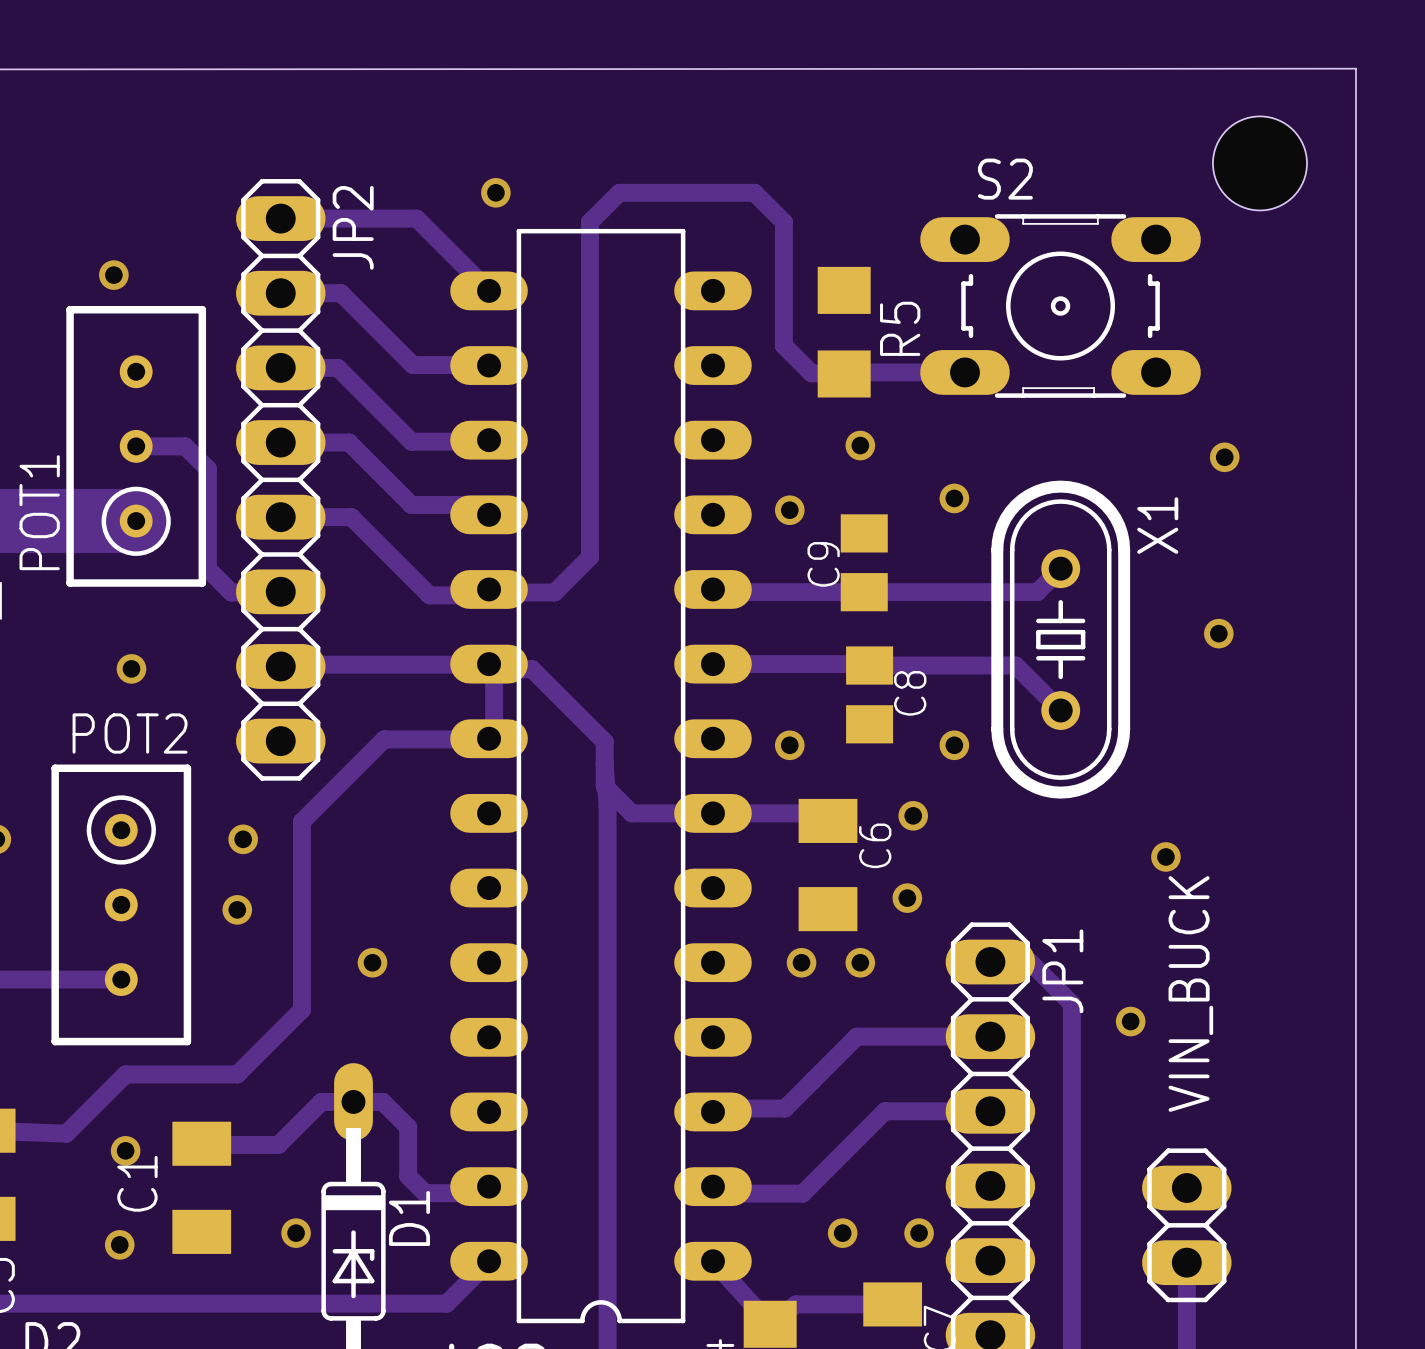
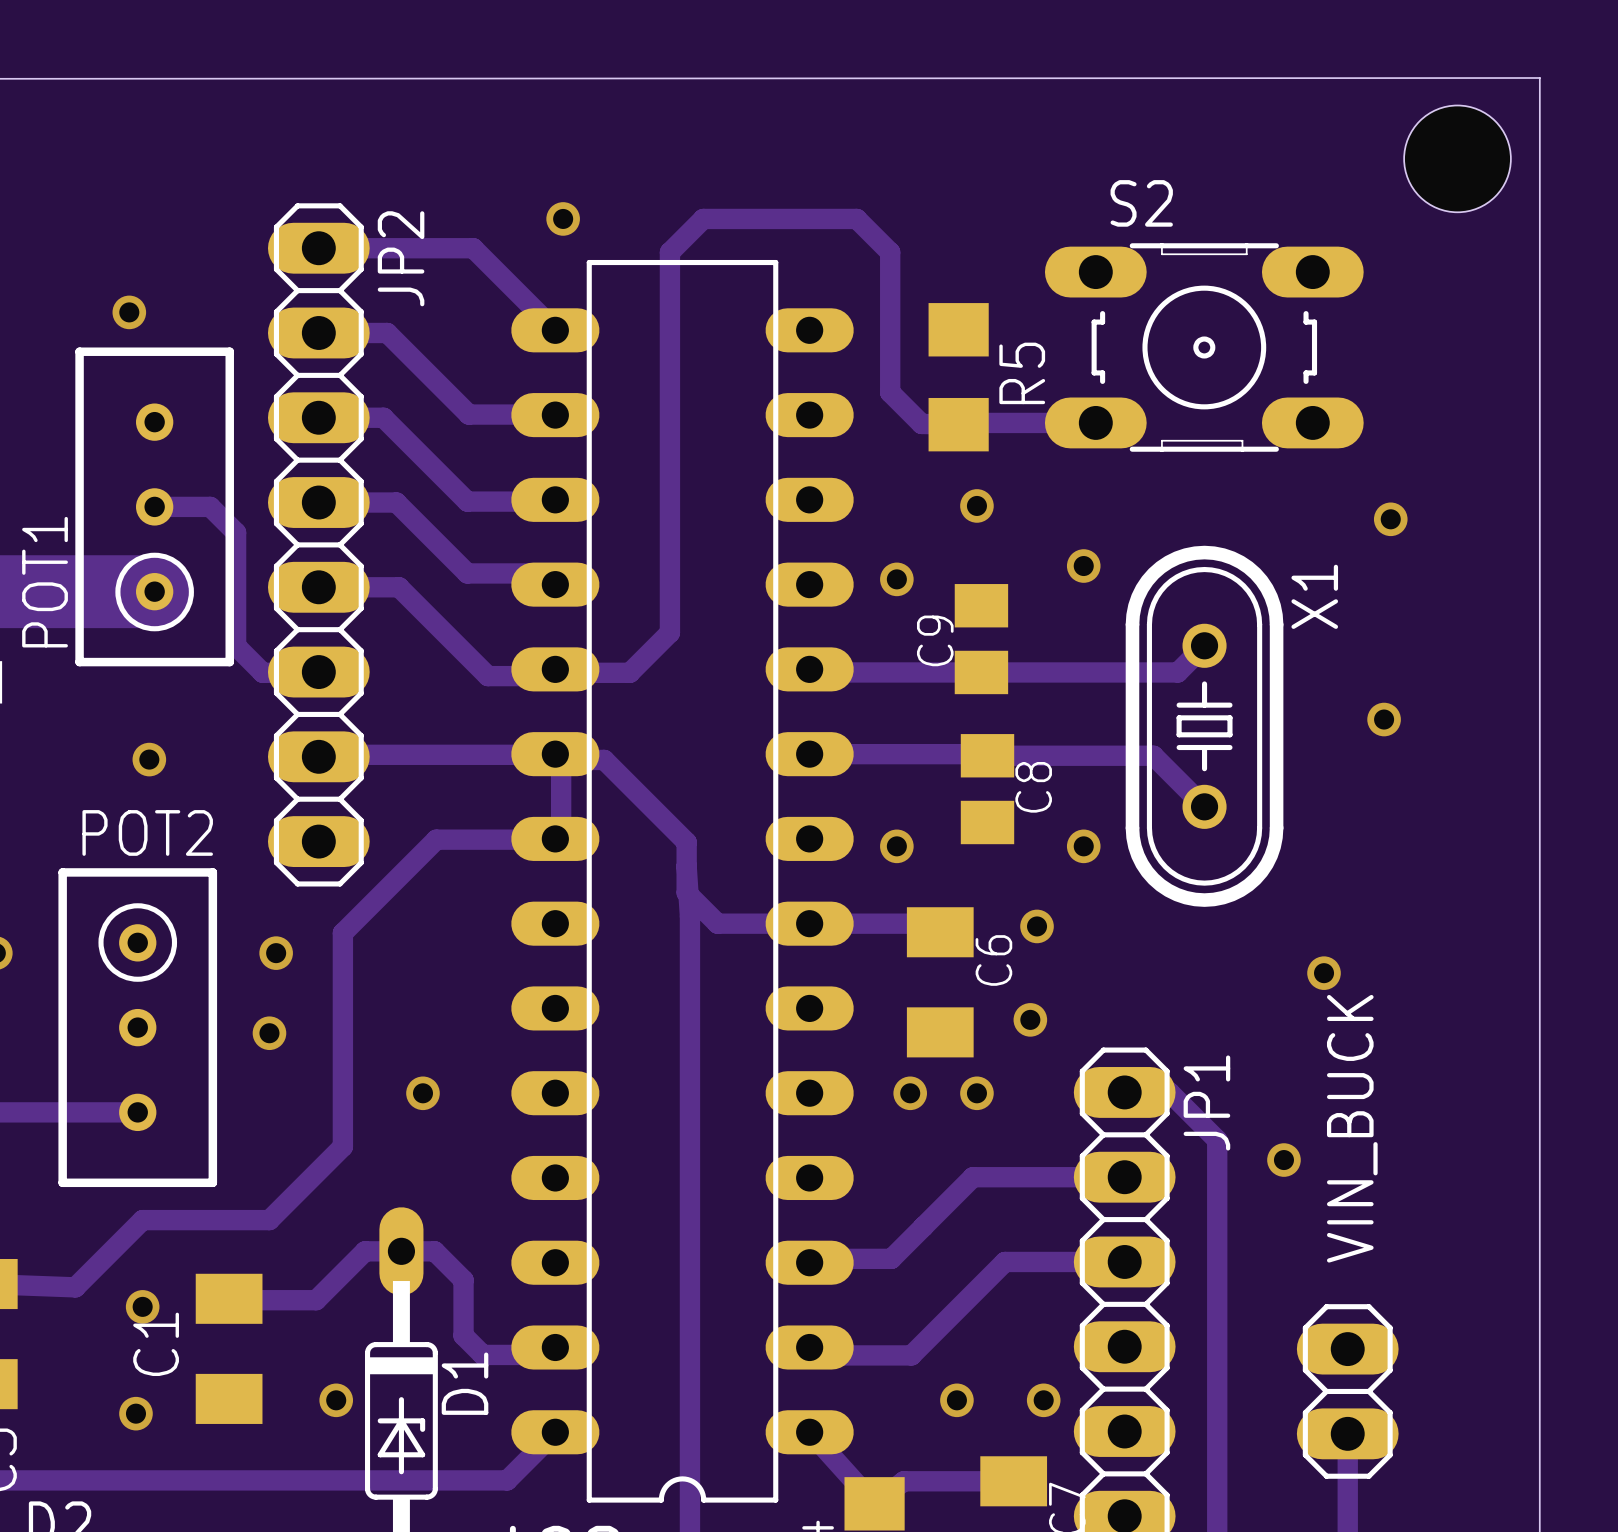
hole position: (1259, 163) -> (1457, 158)

